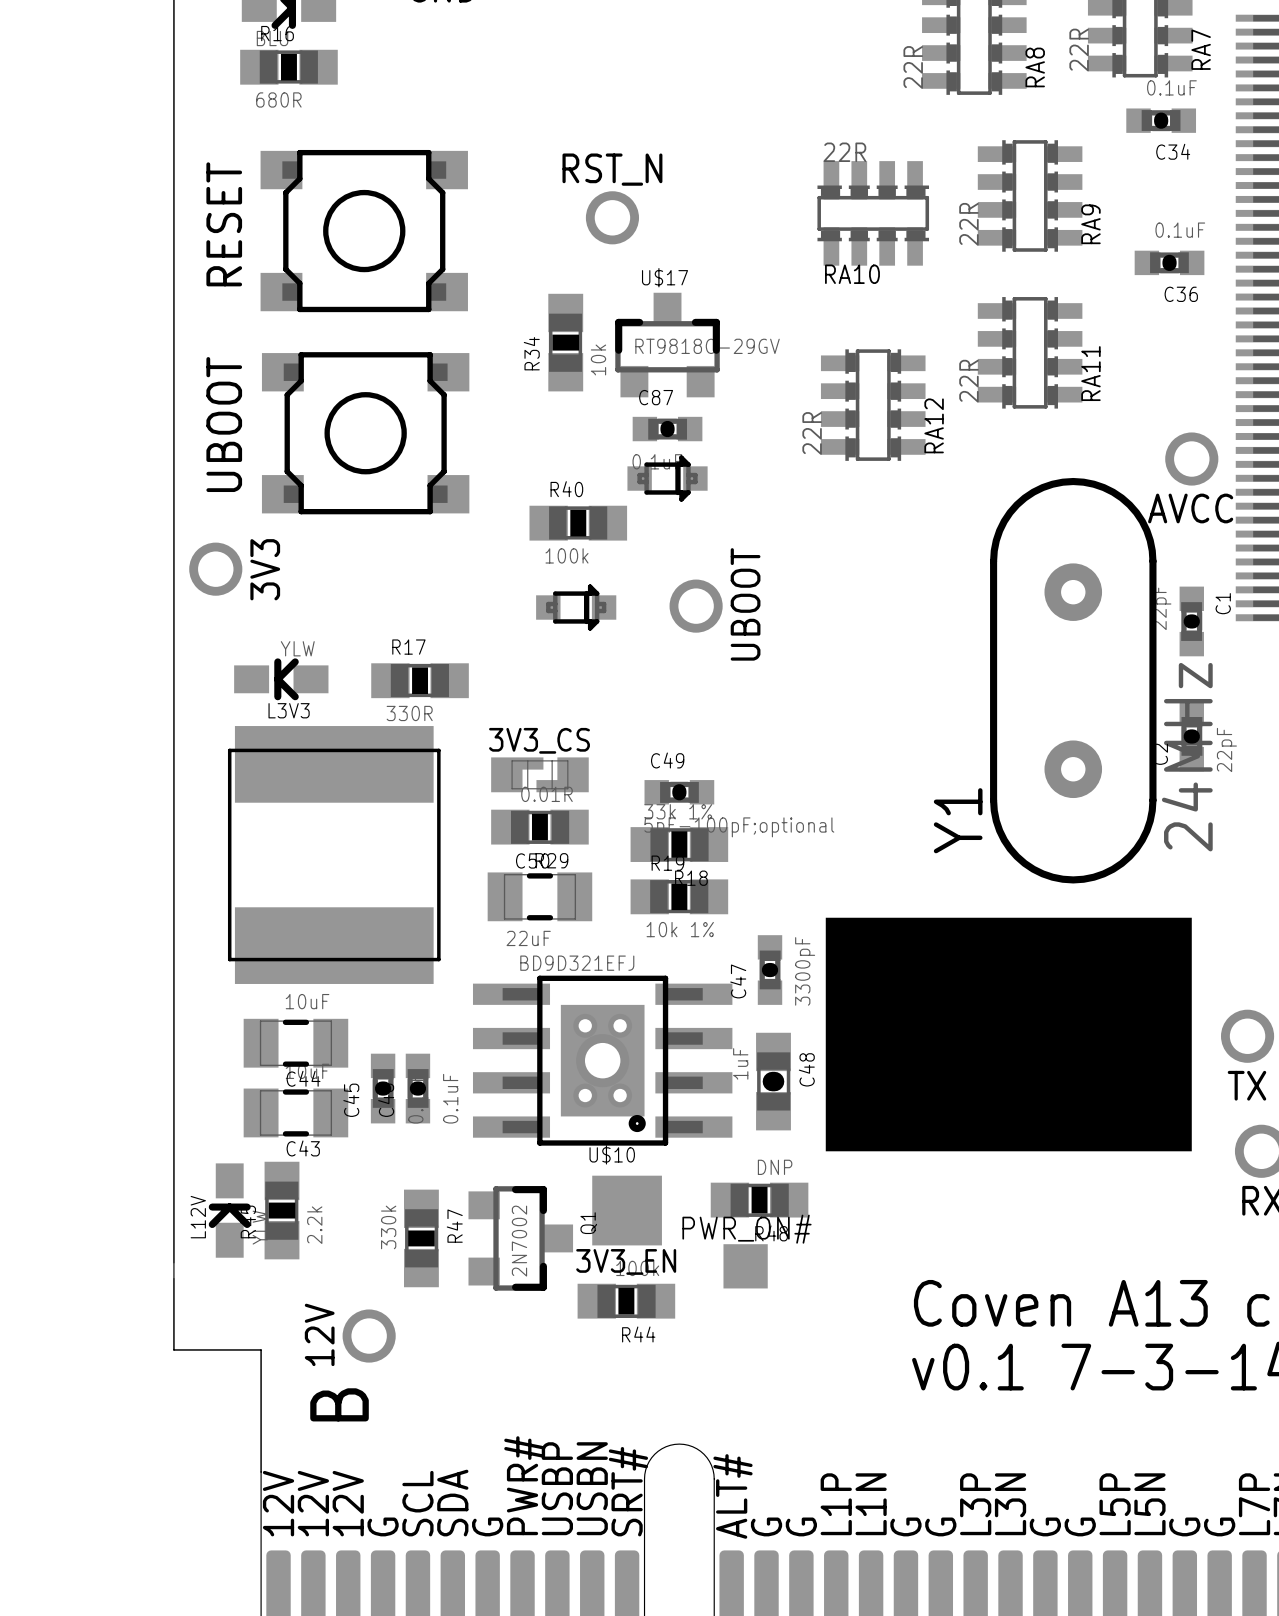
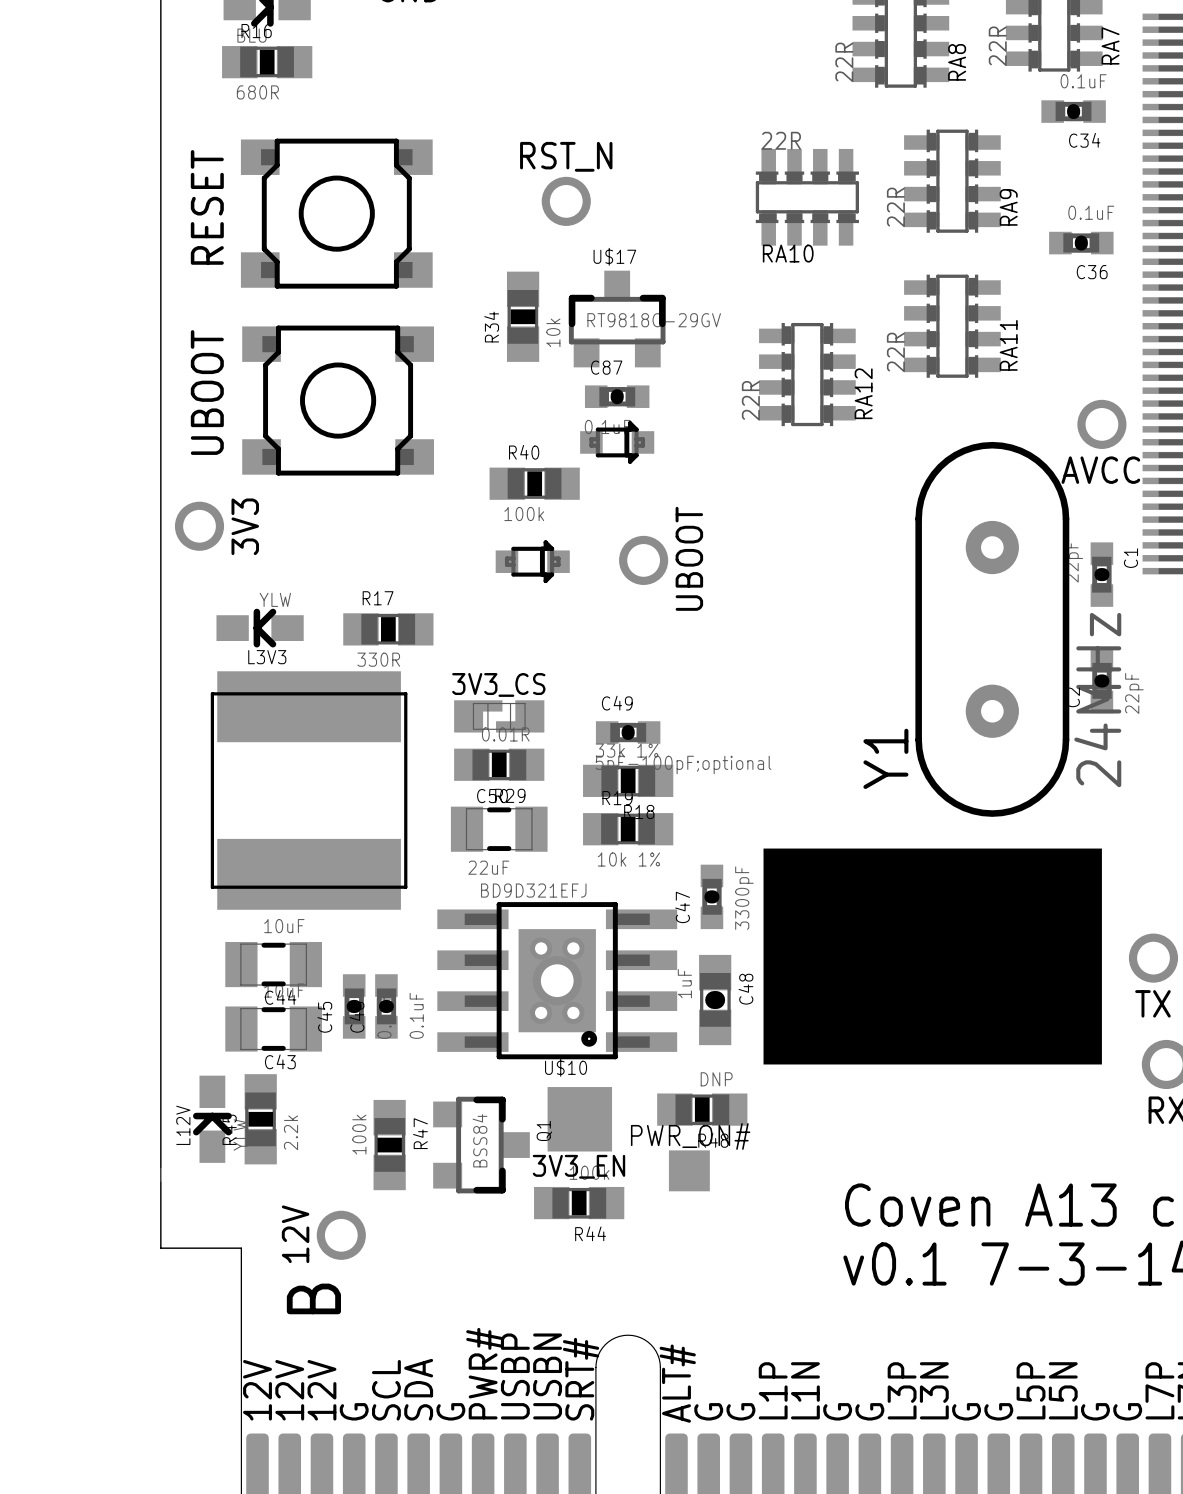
R47 value: 330k (388, 1227) -> 100k (359, 1134)
Q1 value: 2N7002 (519, 1241) -> BSS84 (479, 1140)

